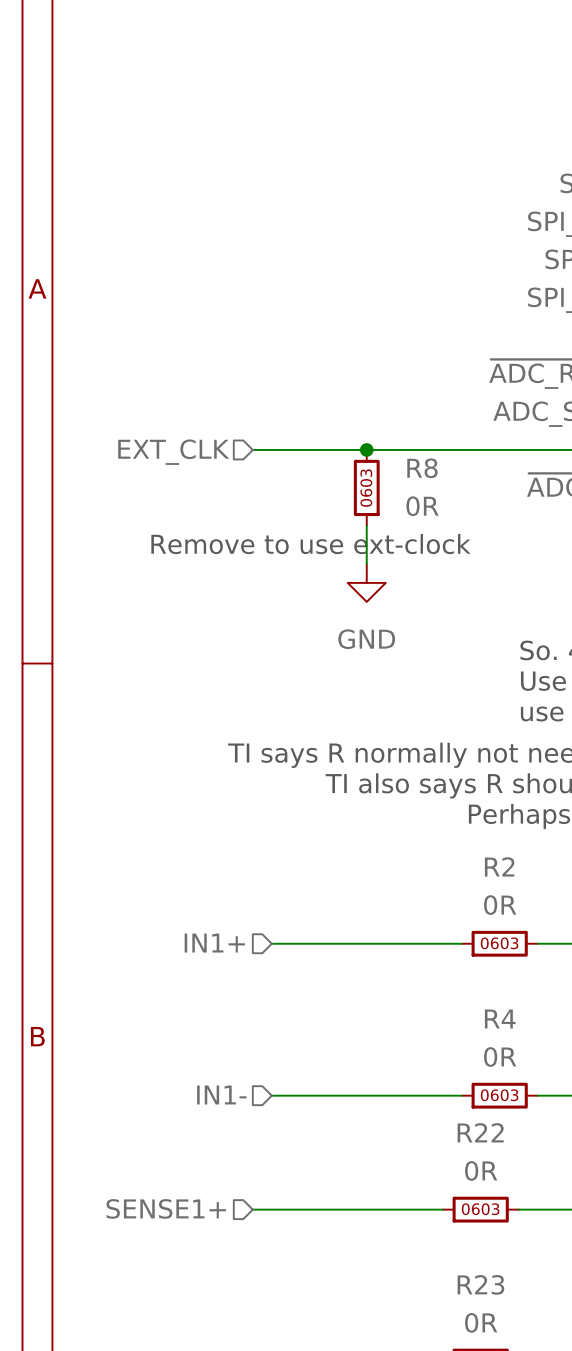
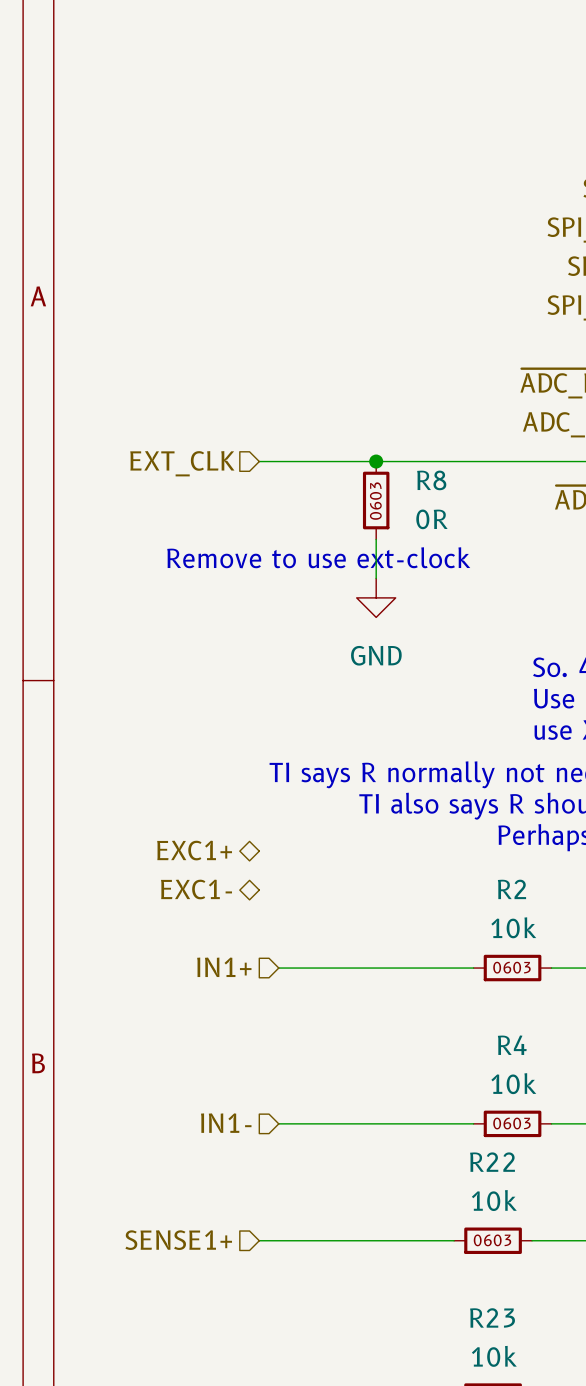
hierarchical label: none -> EXC1+ (194, 850)
hierarchical label: none -> EXC1- (196, 889)
R2 value: 0R (500, 905) -> 10k (513, 927)
R4 value: 0R (500, 1057) -> 10k (513, 1083)
R22 value: 0R (481, 1170) -> 10k (494, 1200)
R23 value: 0R (481, 1322) -> 10k (494, 1356)

